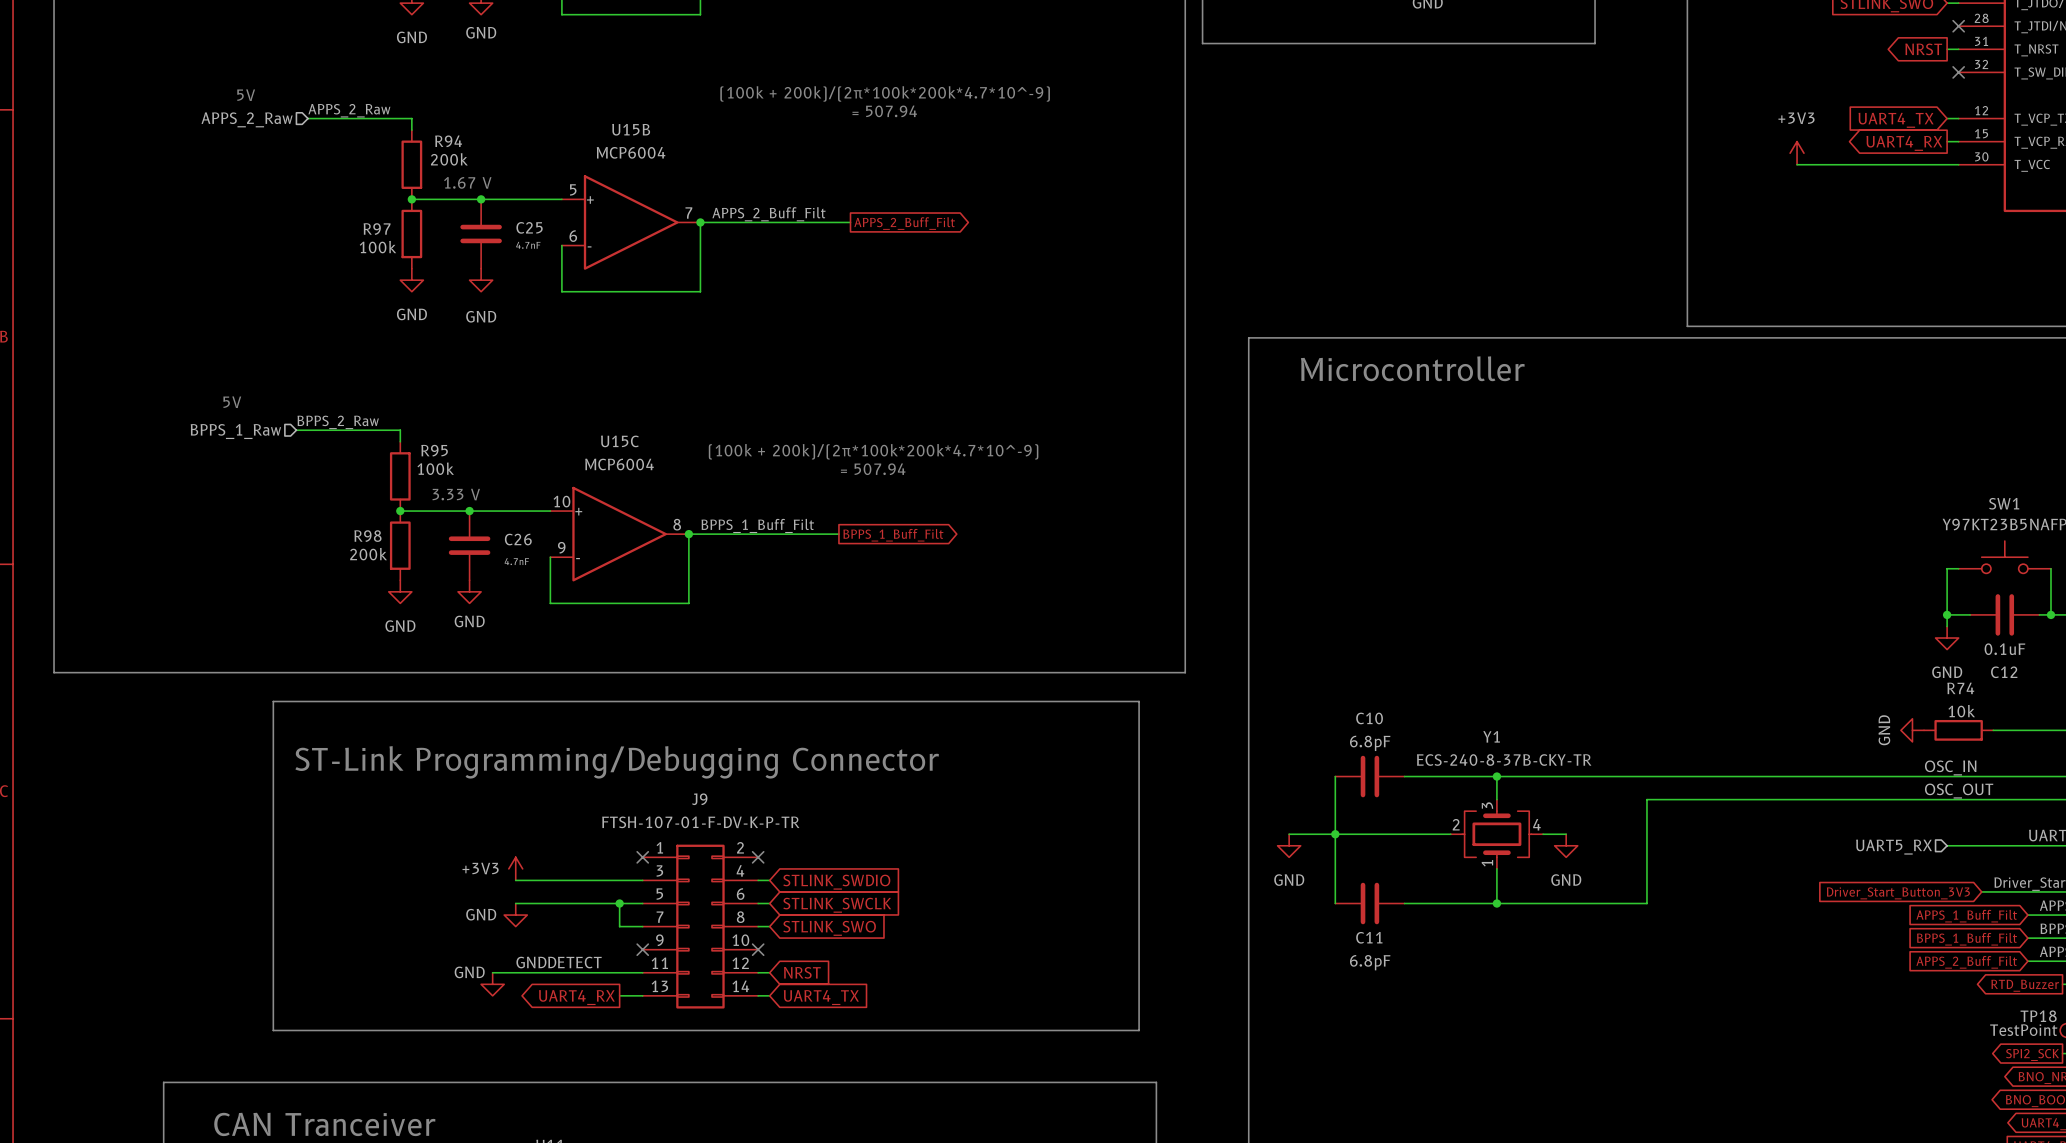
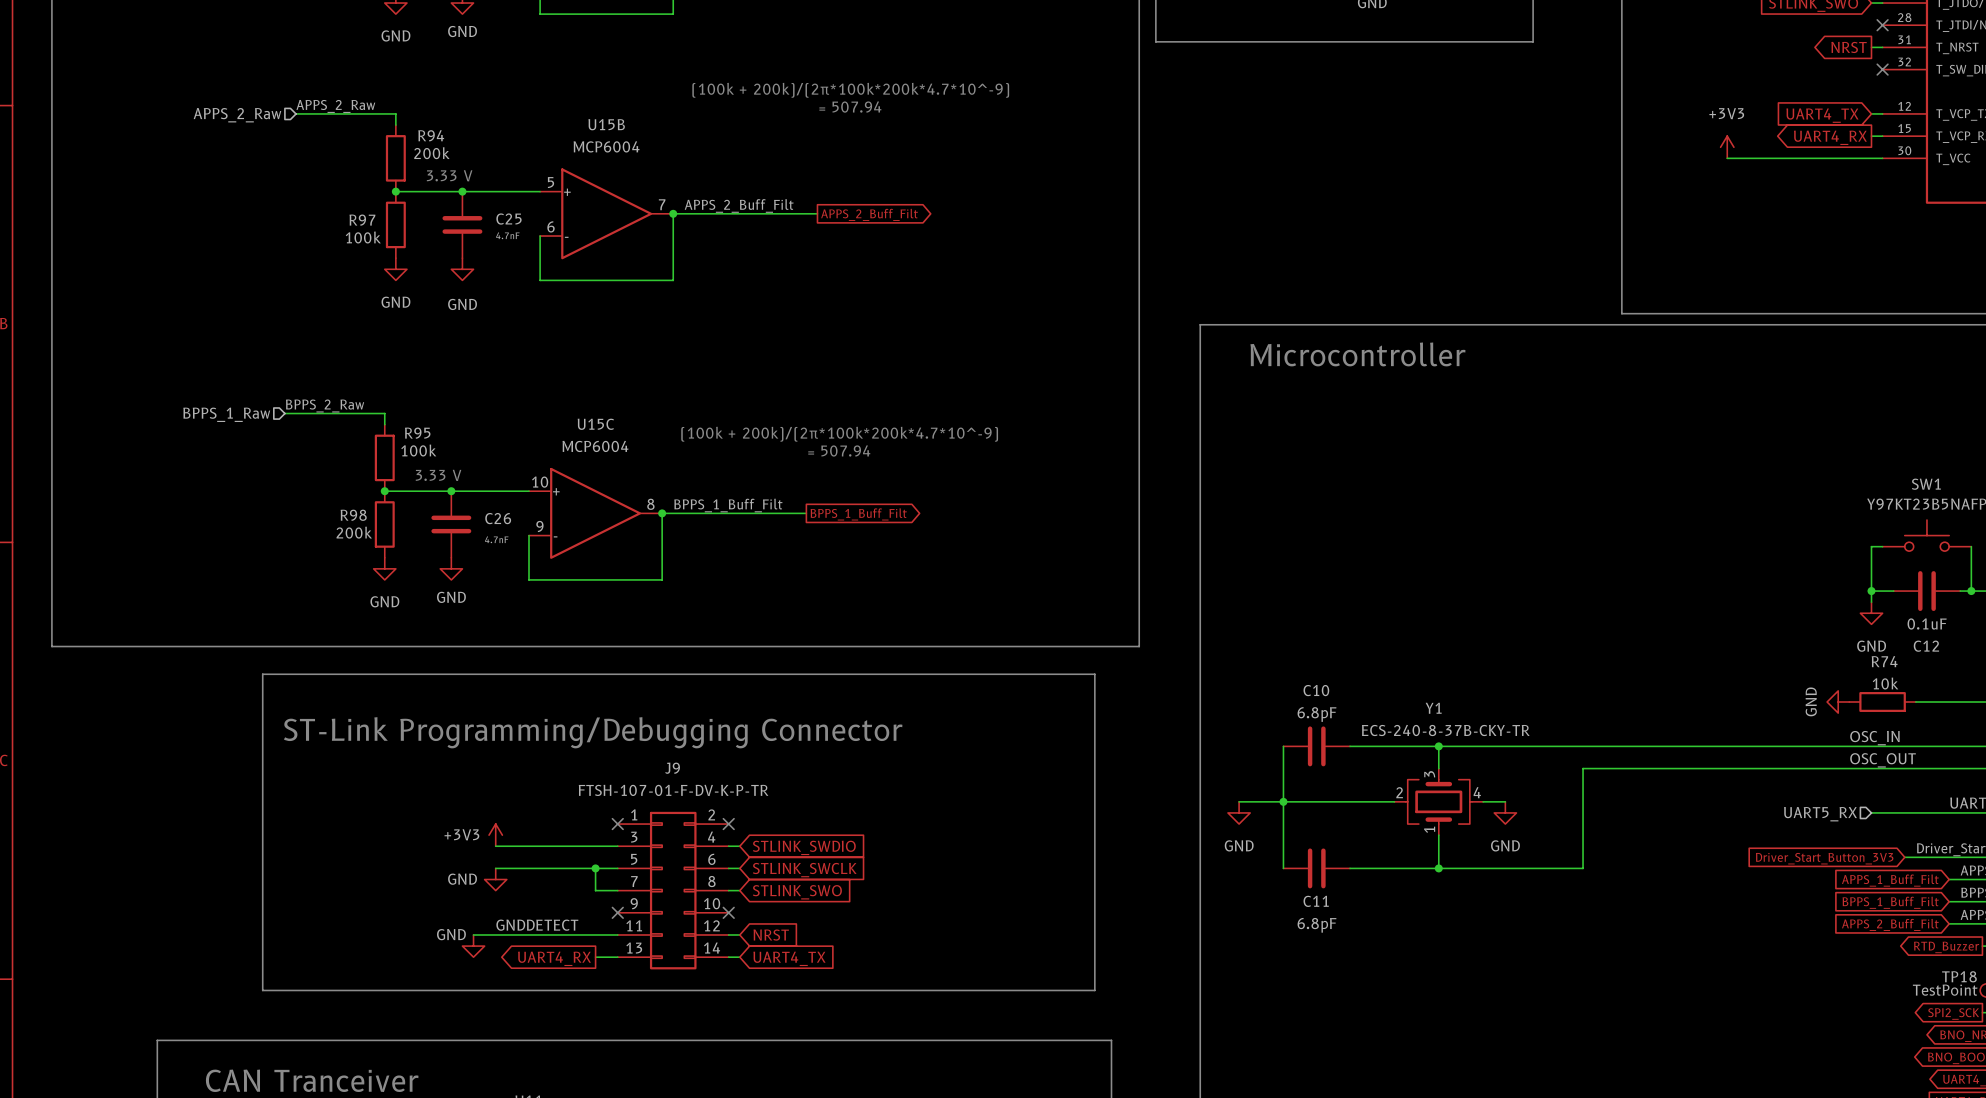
text: 5V (246, 95) -> none
text: 1.67 V (467, 182) -> 3.33 V (449, 175)
text: 5V (232, 402) -> none

